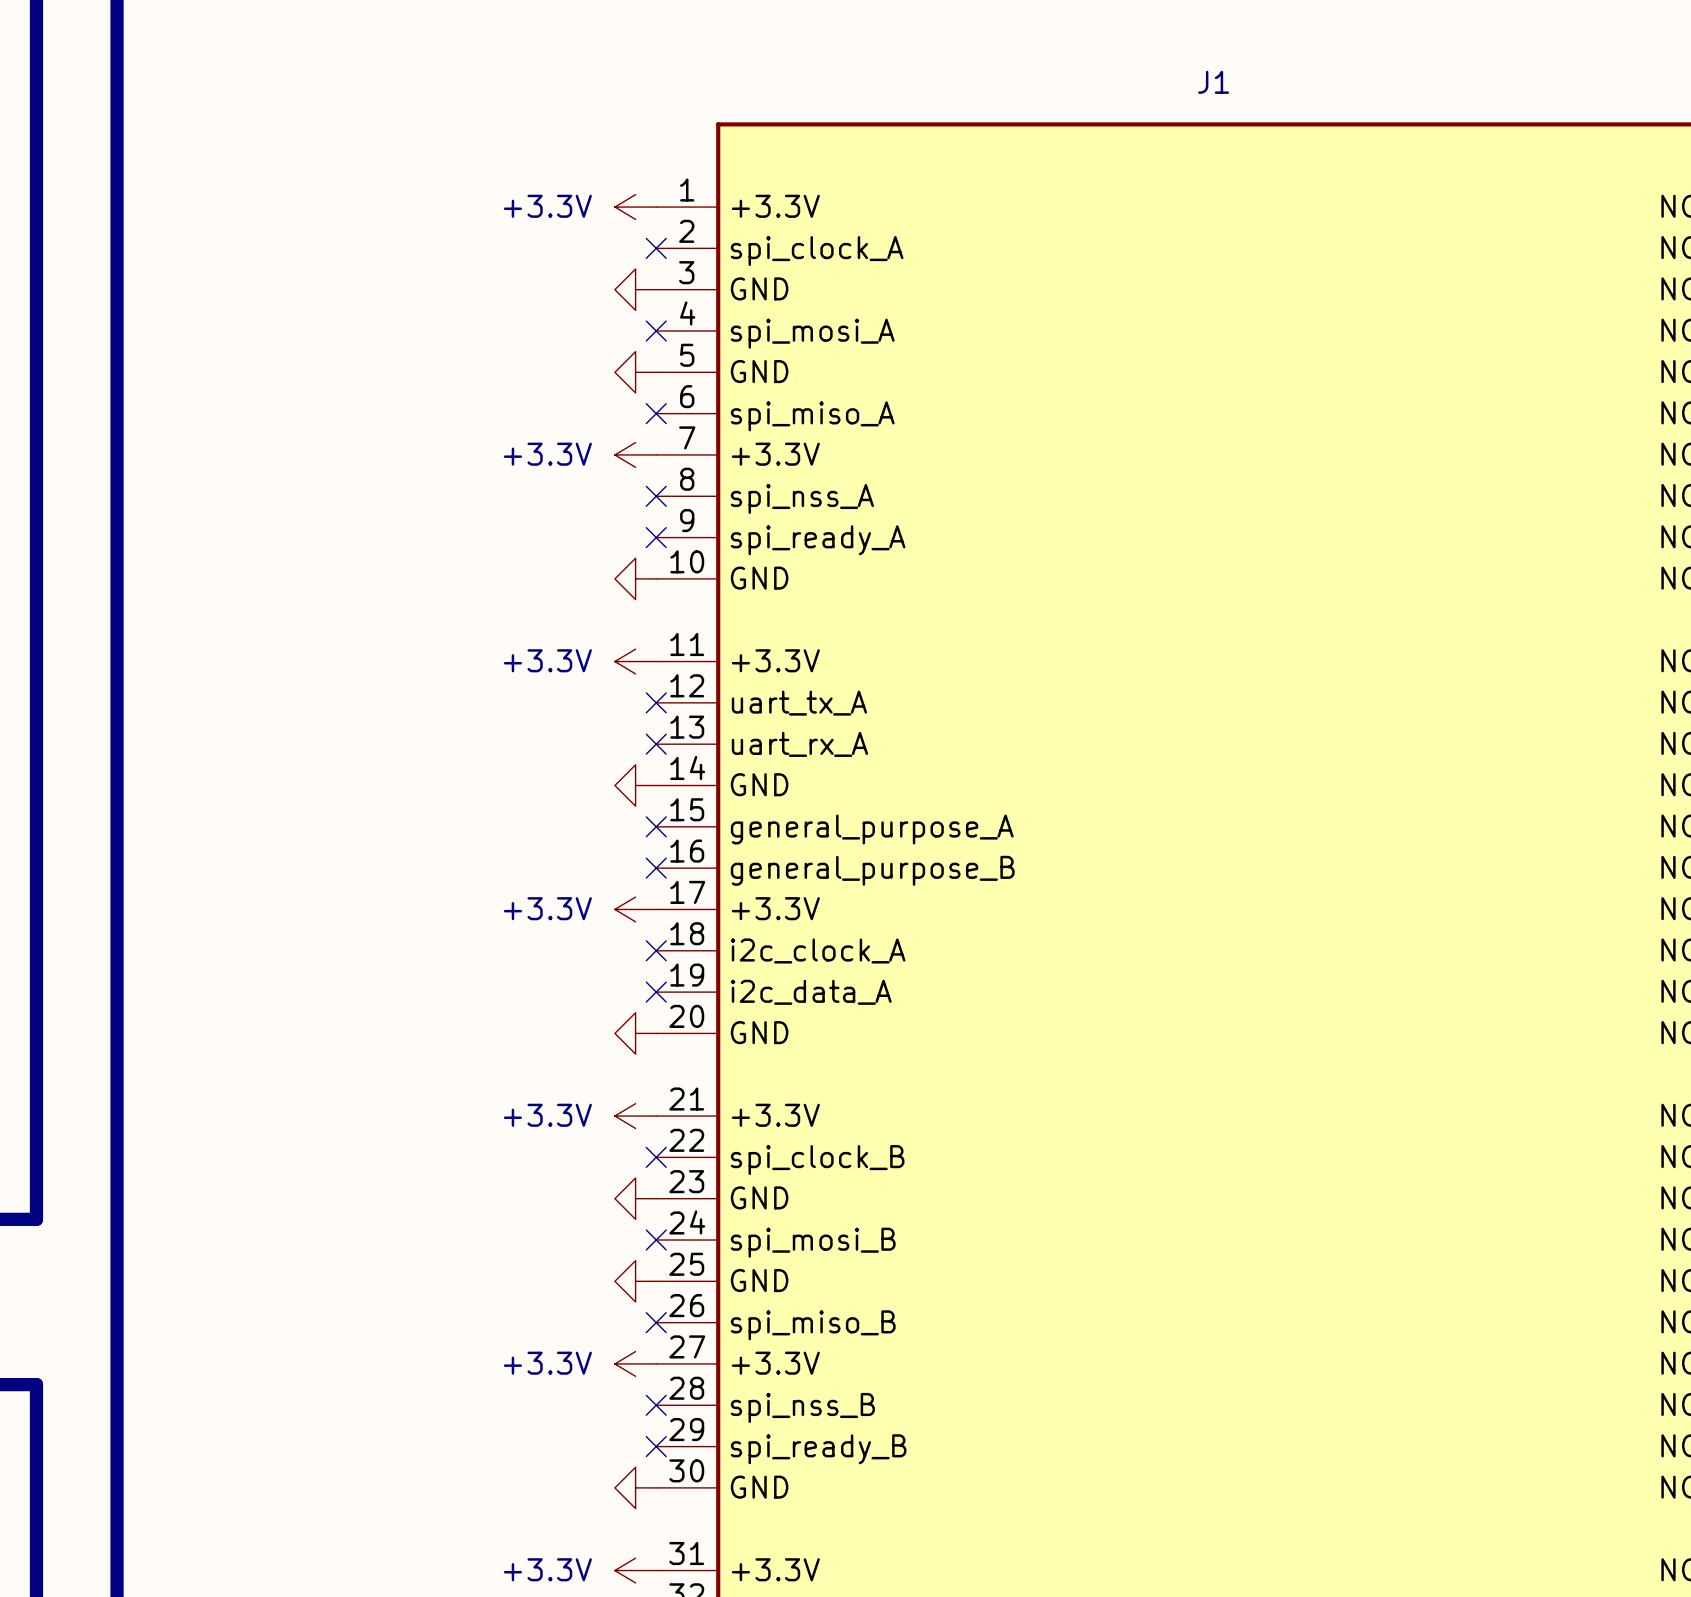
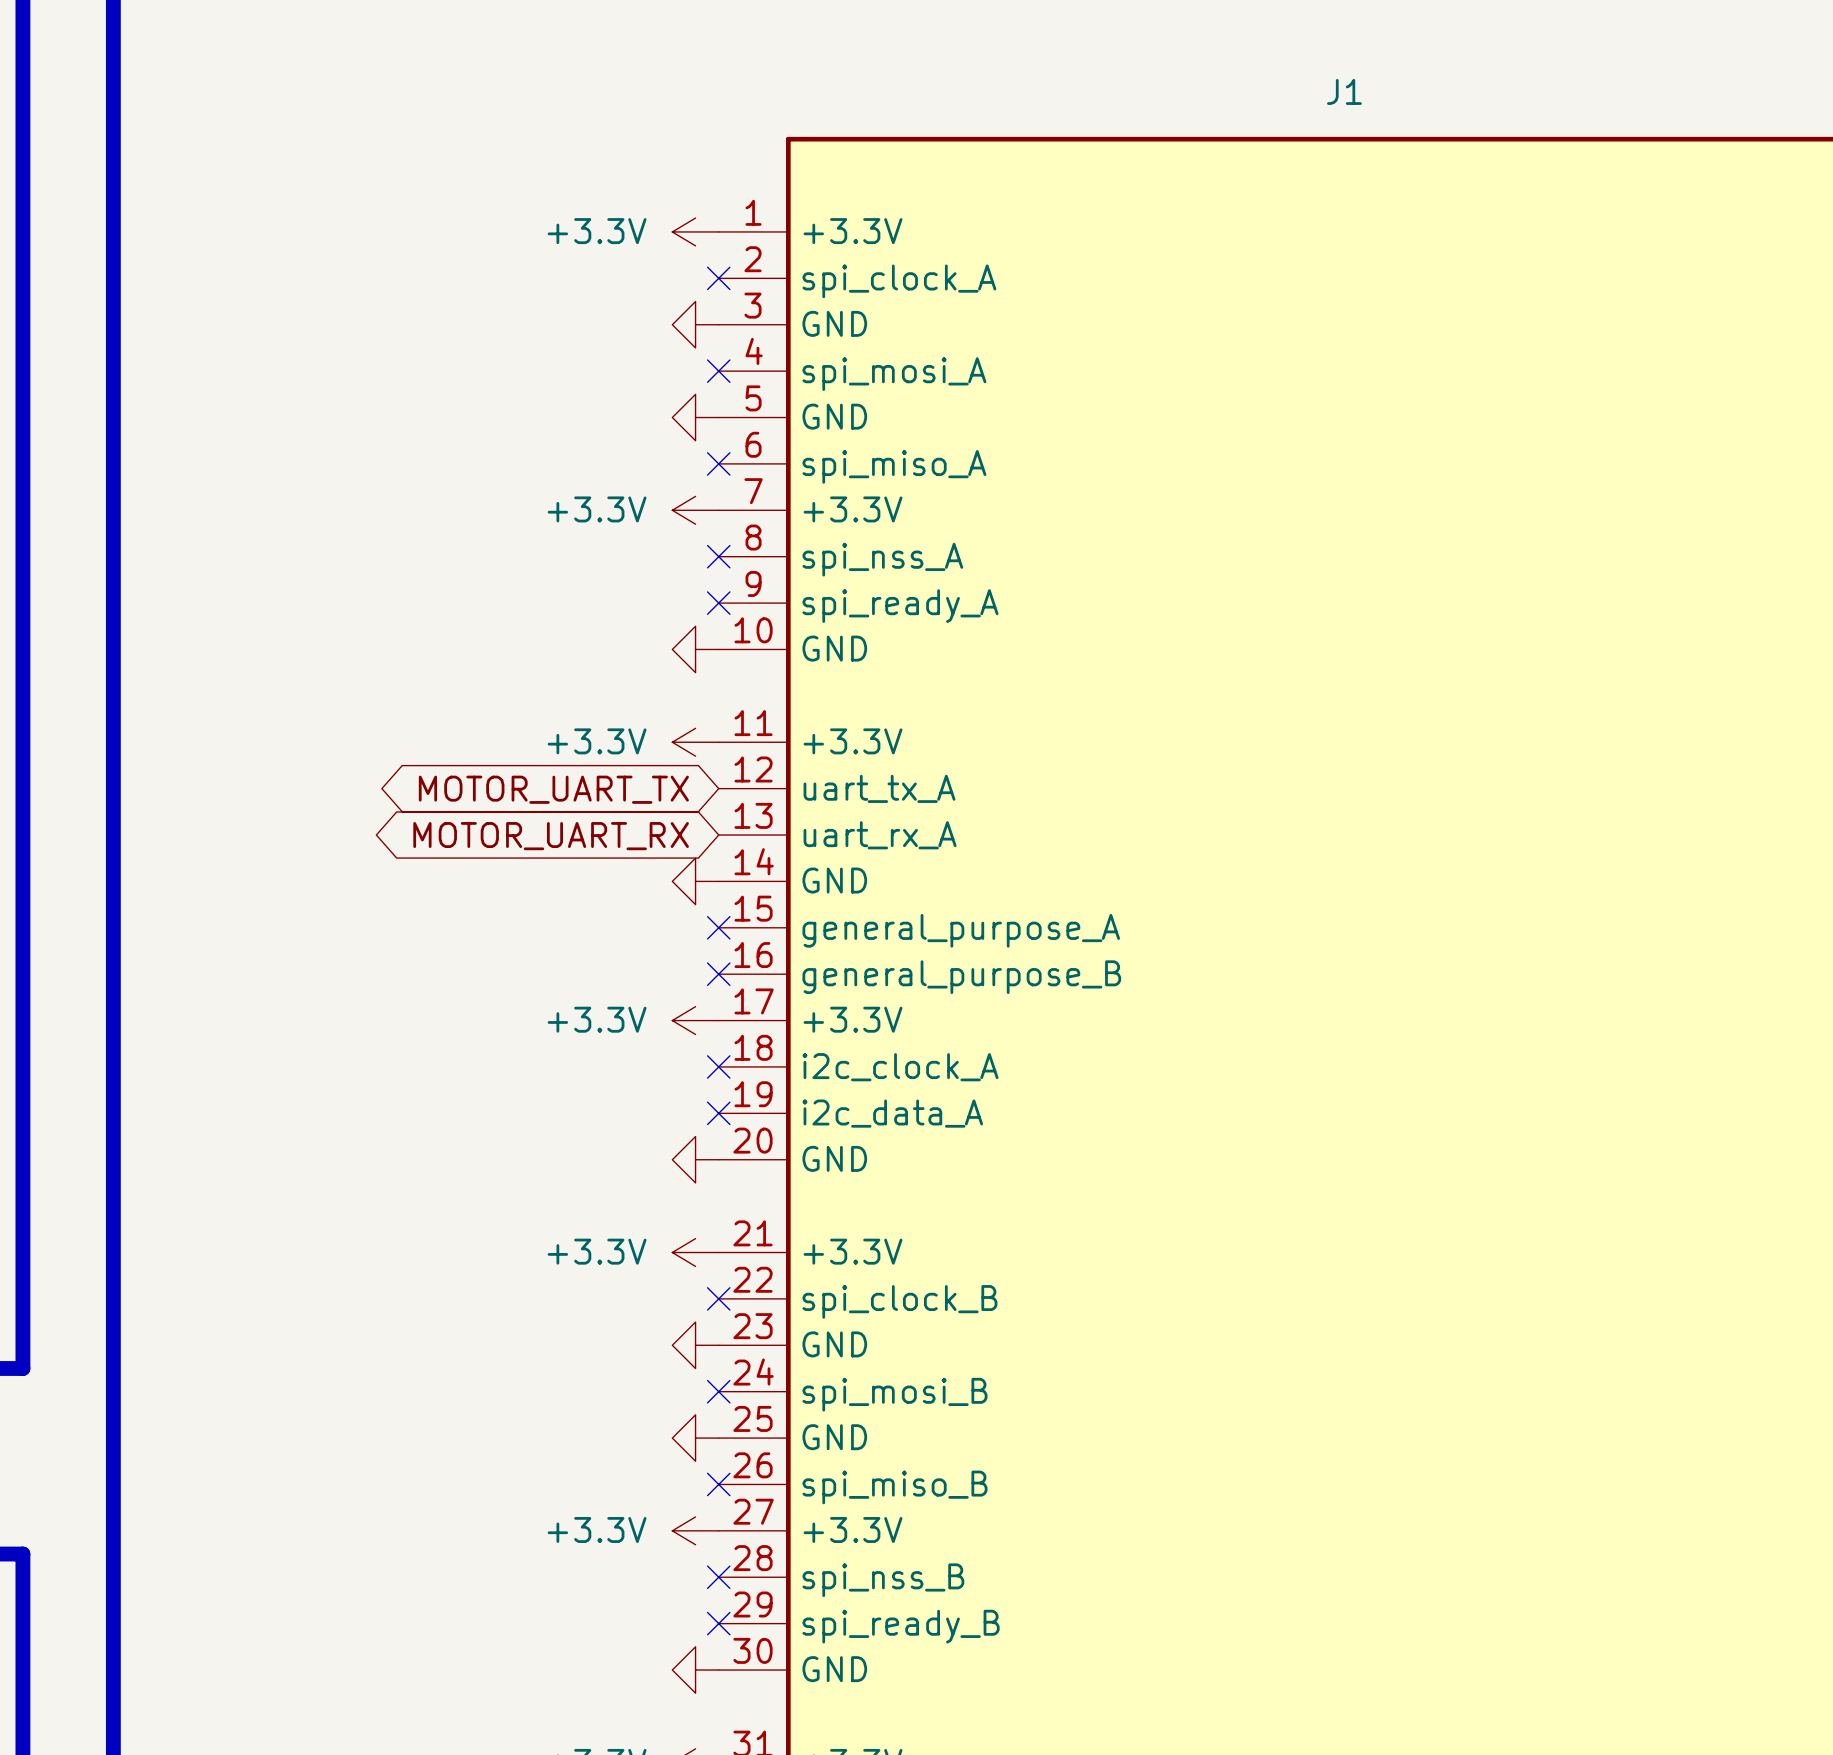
no-connect mark: (656, 702) -> none
global label: none -> MOTOR_UART_TX (553, 789)
no-connect mark: (656, 744) -> none
global label: none -> MOTOR_UART_RX (551, 836)

